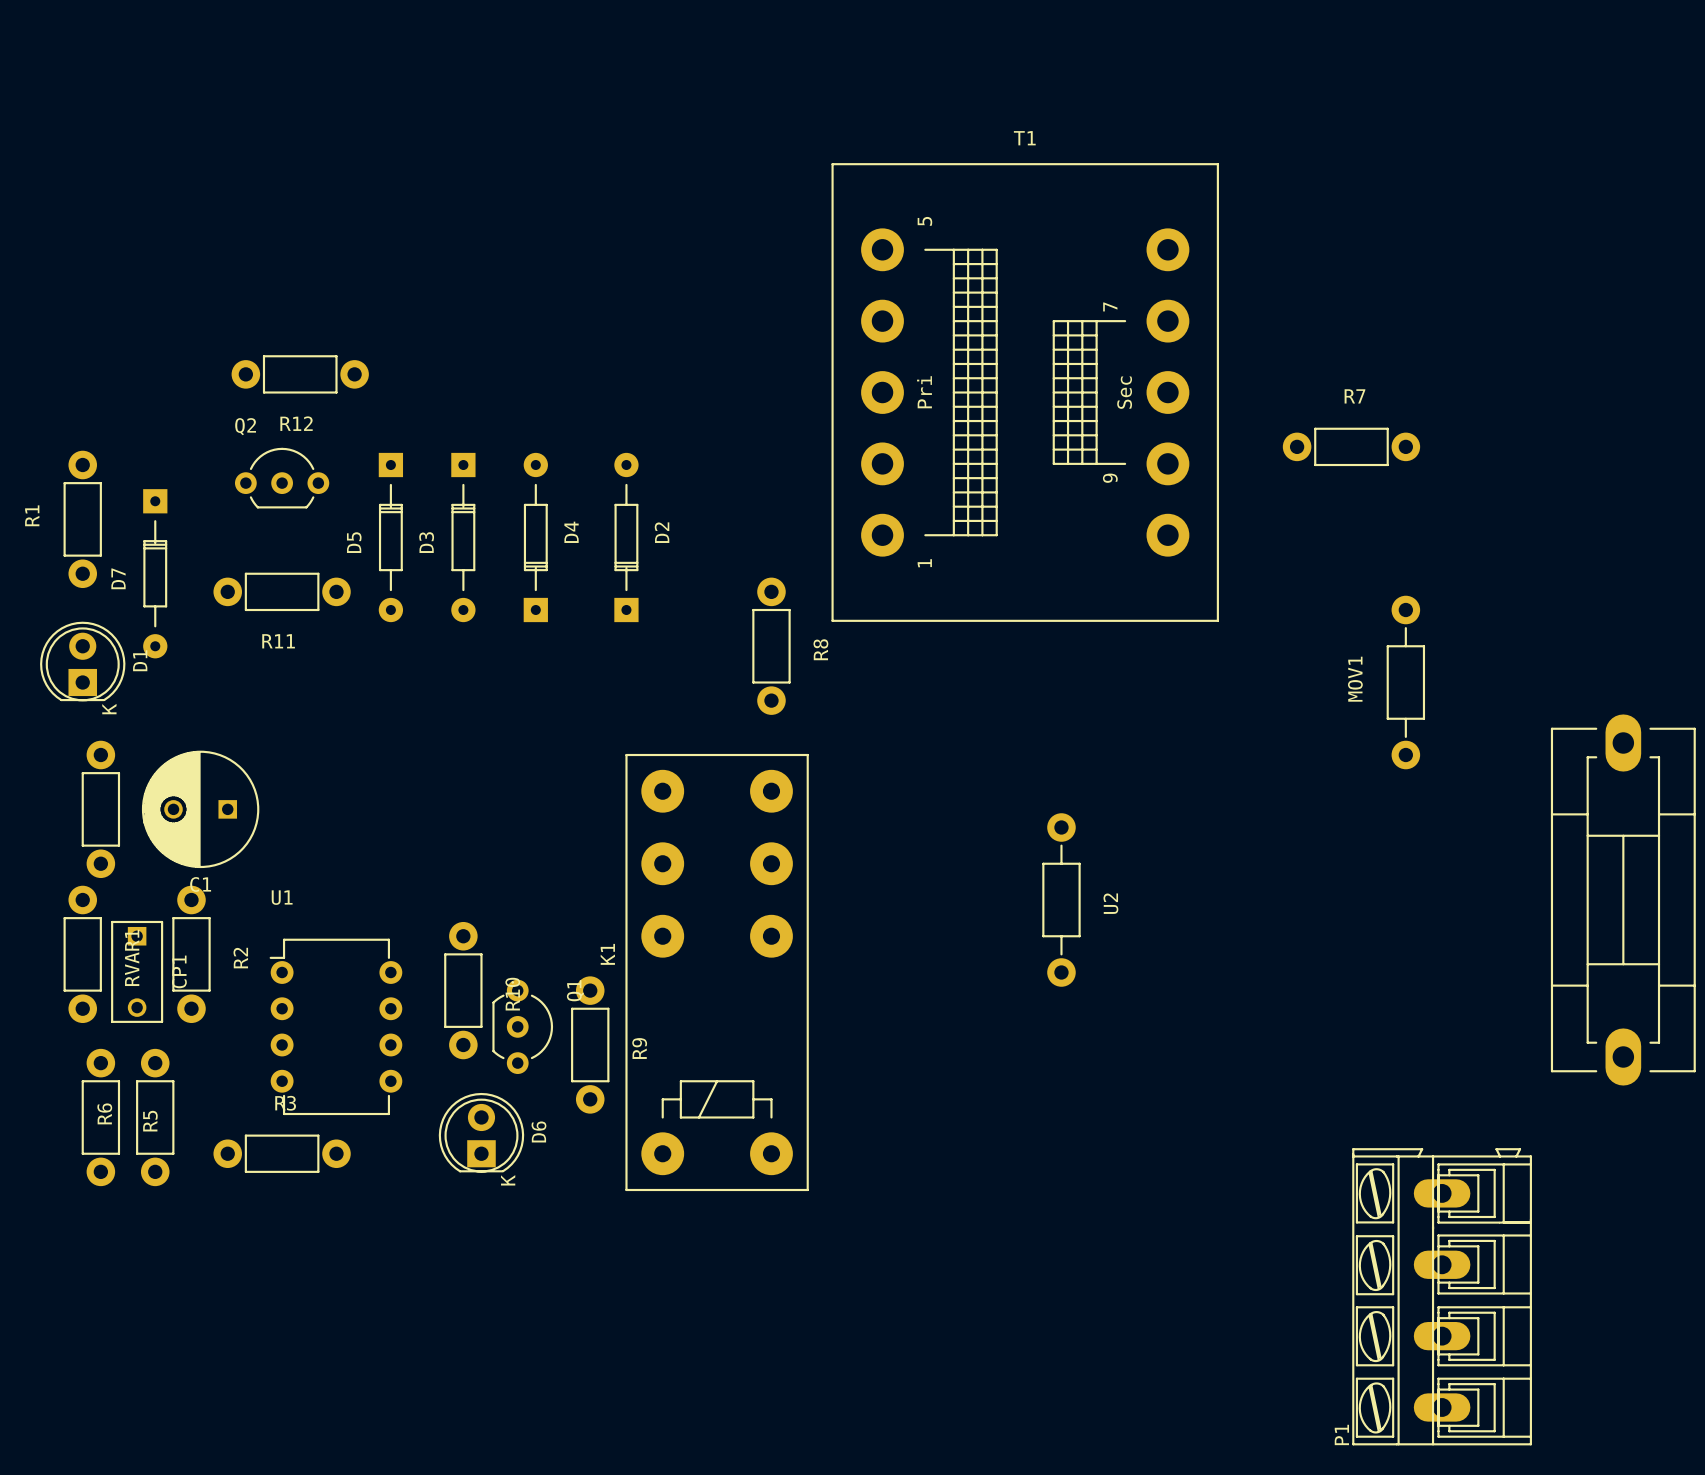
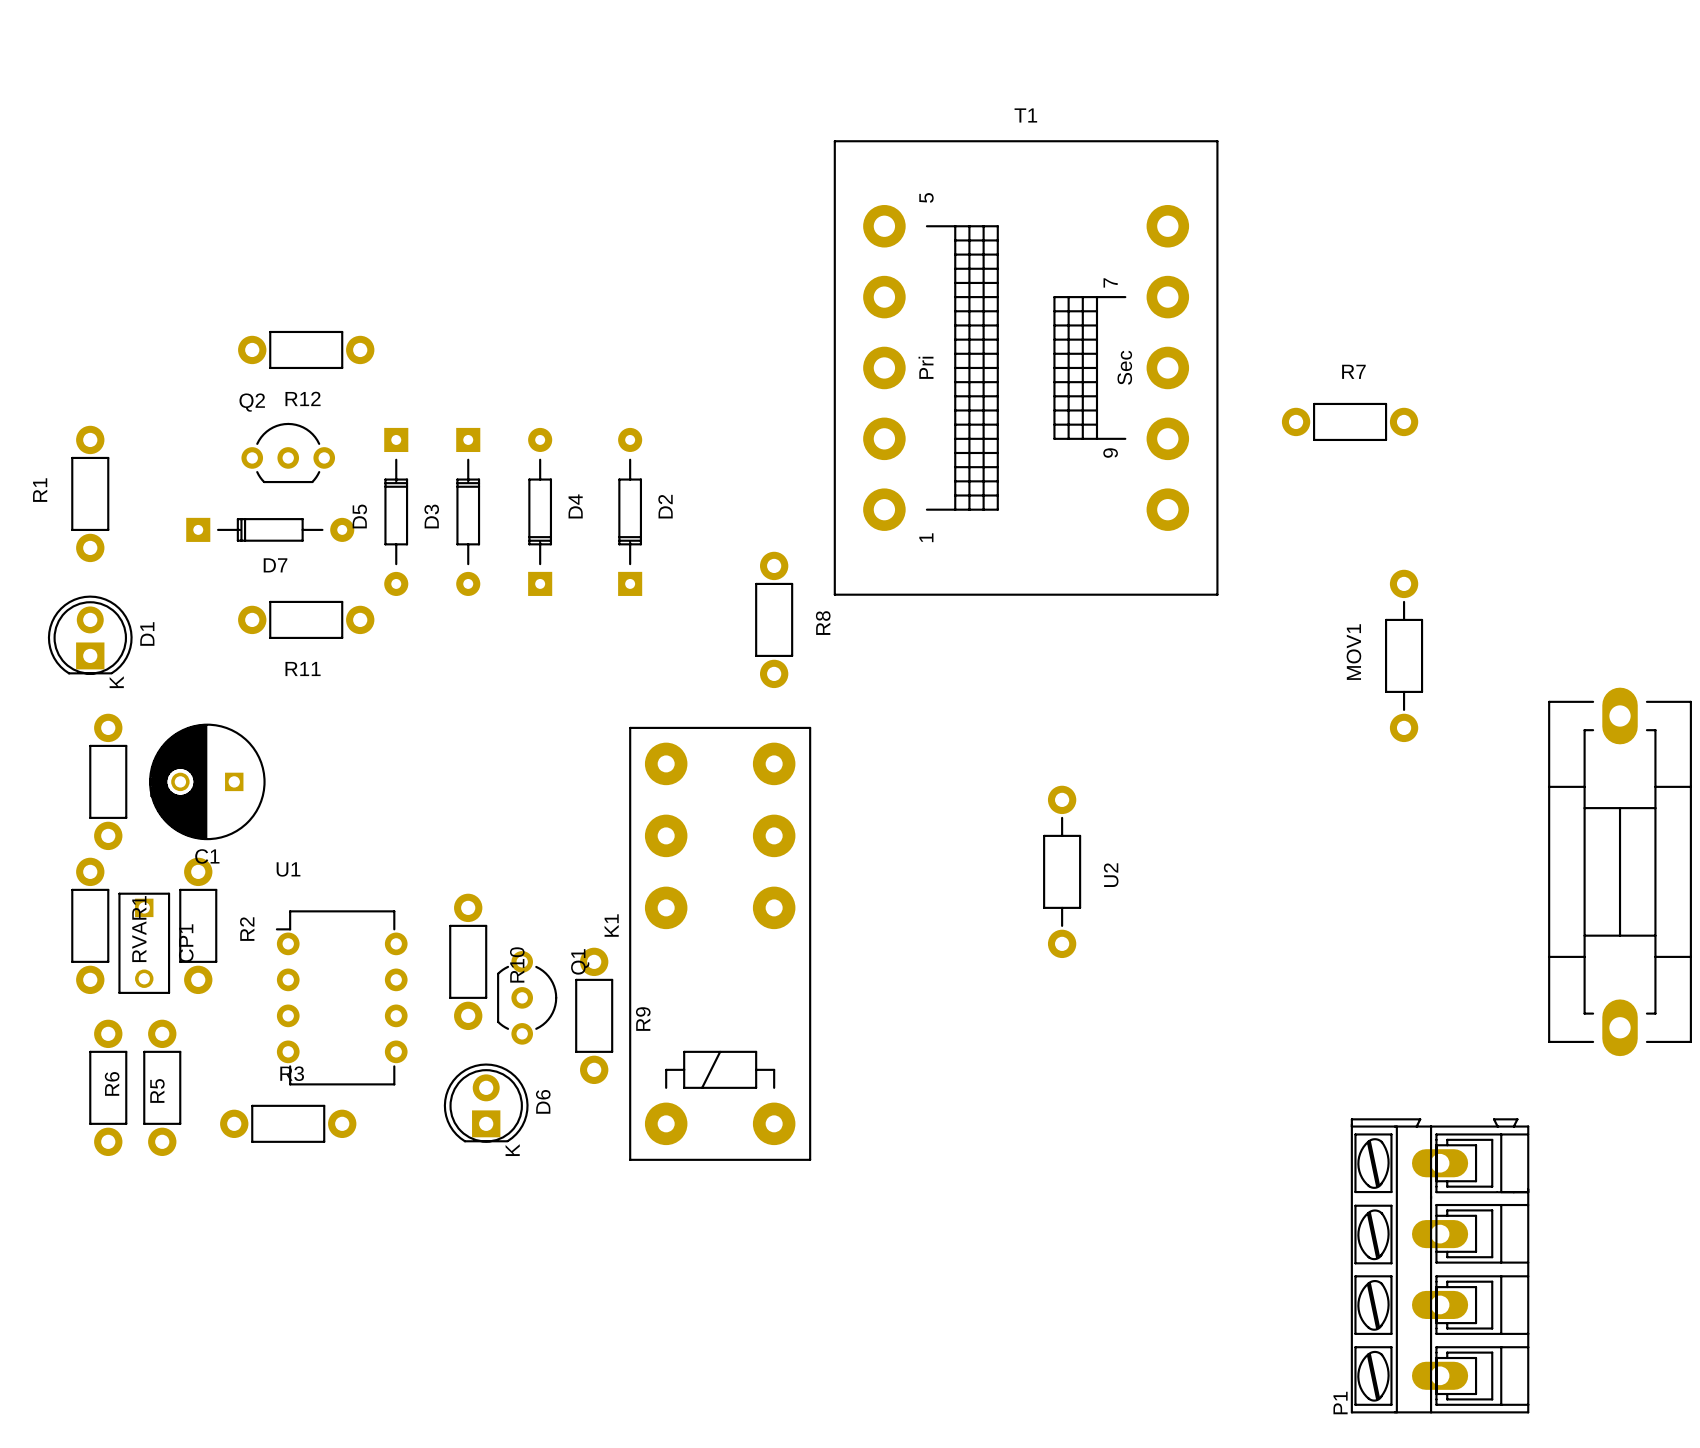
D7 rotation: 0° (155, 573) -> 90° counterclockwise (270, 529)
D7 position: (155, 573) -> (270, 529)
R11 position: (282, 591) -> (306, 619)

